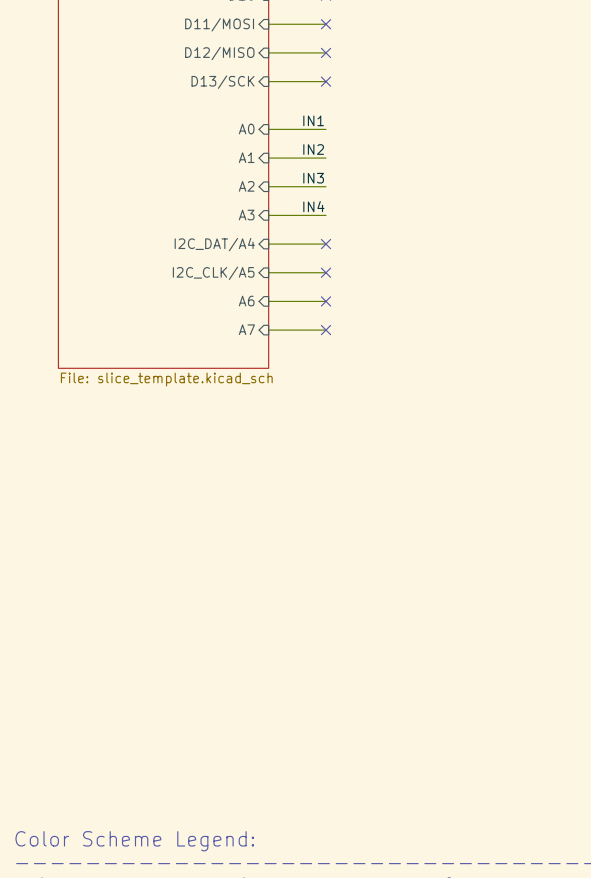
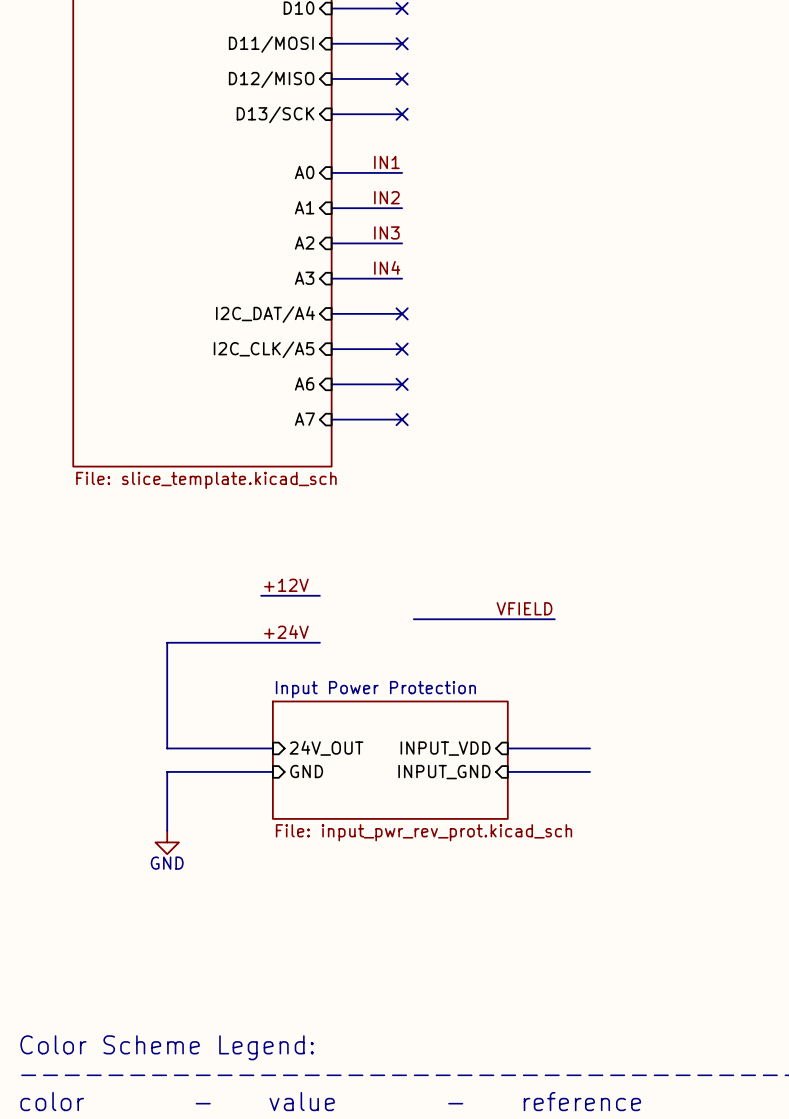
label: none -> +12V (286, 585)
wire: none -> (261, 595) (319, 595)
label: none -> VFIELD (524, 608)
wire: none -> (413, 619) (554, 619)
label: none -> +24V (286, 631)
wire: none -> (319, 642) (167, 642) (167, 748) (272, 748)
sheet pin: none -> 24V_OUT (326, 748)
sheet pin: none -> INPUT_VDD (445, 748)
wire: none -> (507, 748) (590, 748)
sheet Input Power Protection: none -> File: input_pwr_rev_prot.kicad_sch (390, 760)
wire: none -> (272, 771) (167, 771) (167, 830)
sheet pin: none -> GND (306, 771)
sheet pin: none -> INPUT_GND (444, 772)
wire: none -> (507, 771) (590, 771)
power symbol: none -> GND (167, 842)

